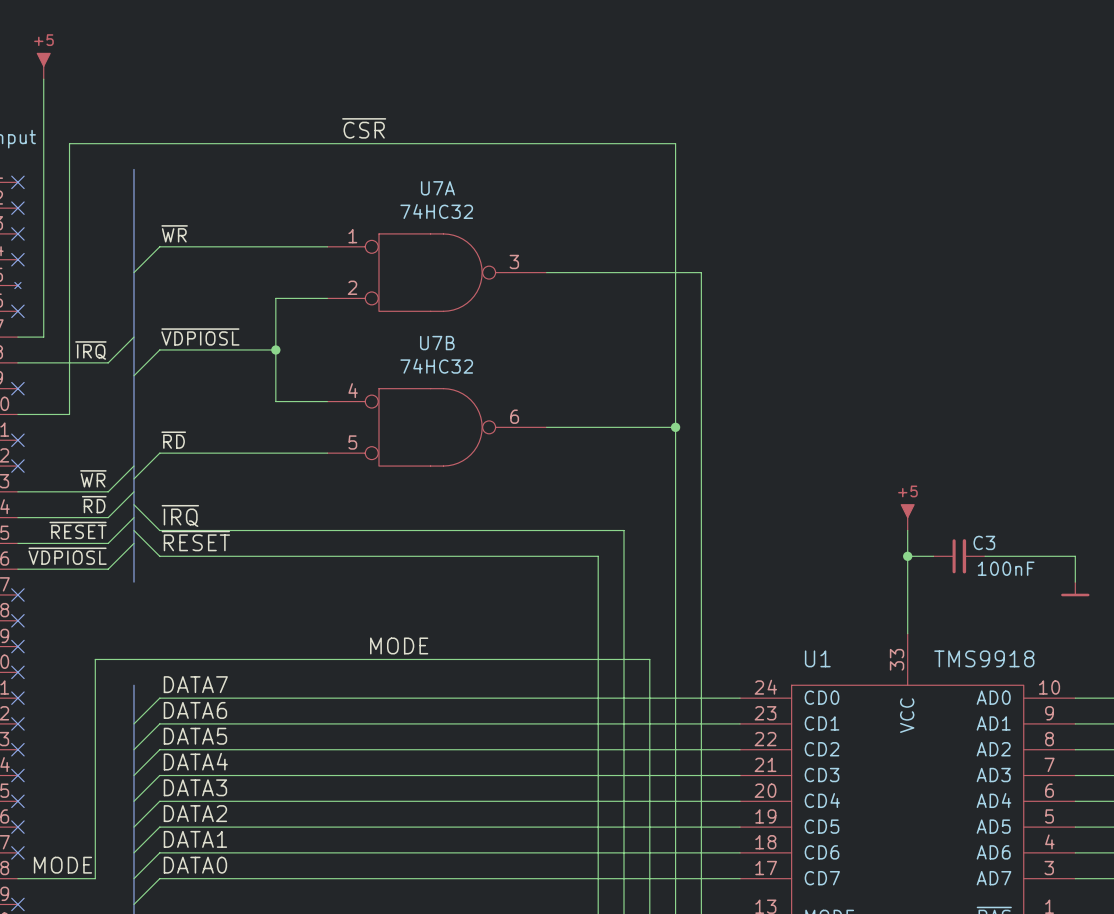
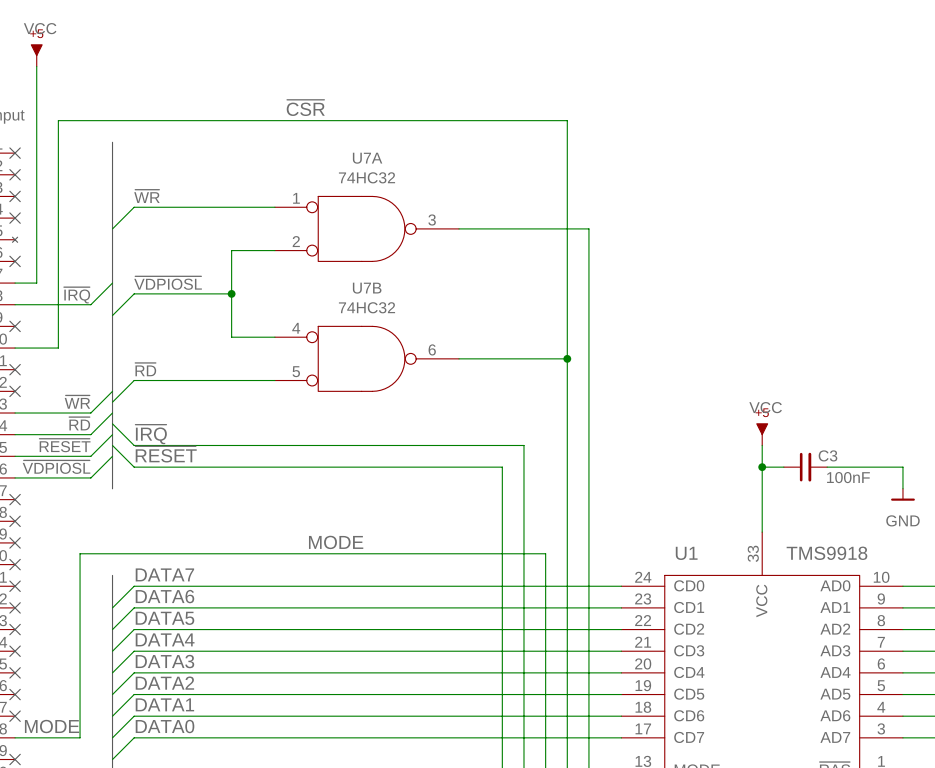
power symbol text: none -> VCC (40, 28)
power symbol text: none -> VCC (765, 407)
power symbol text: none -> GND (903, 520)

